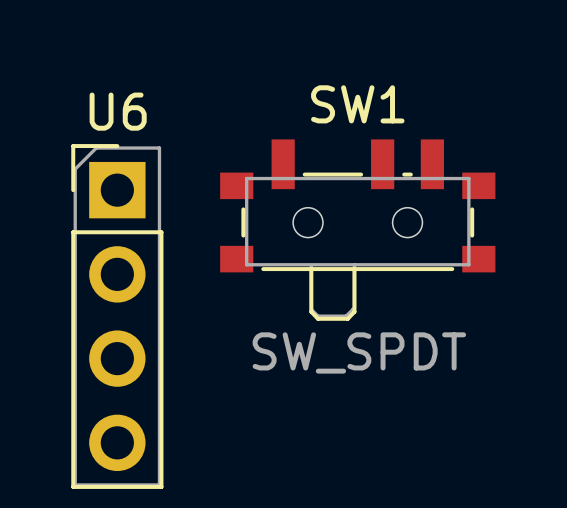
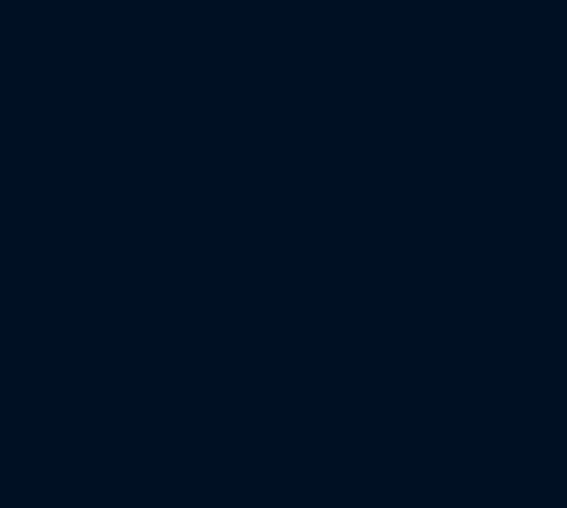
SW1: SW_SPDT (357, 230) -> none
U6: (117, 316) -> none

